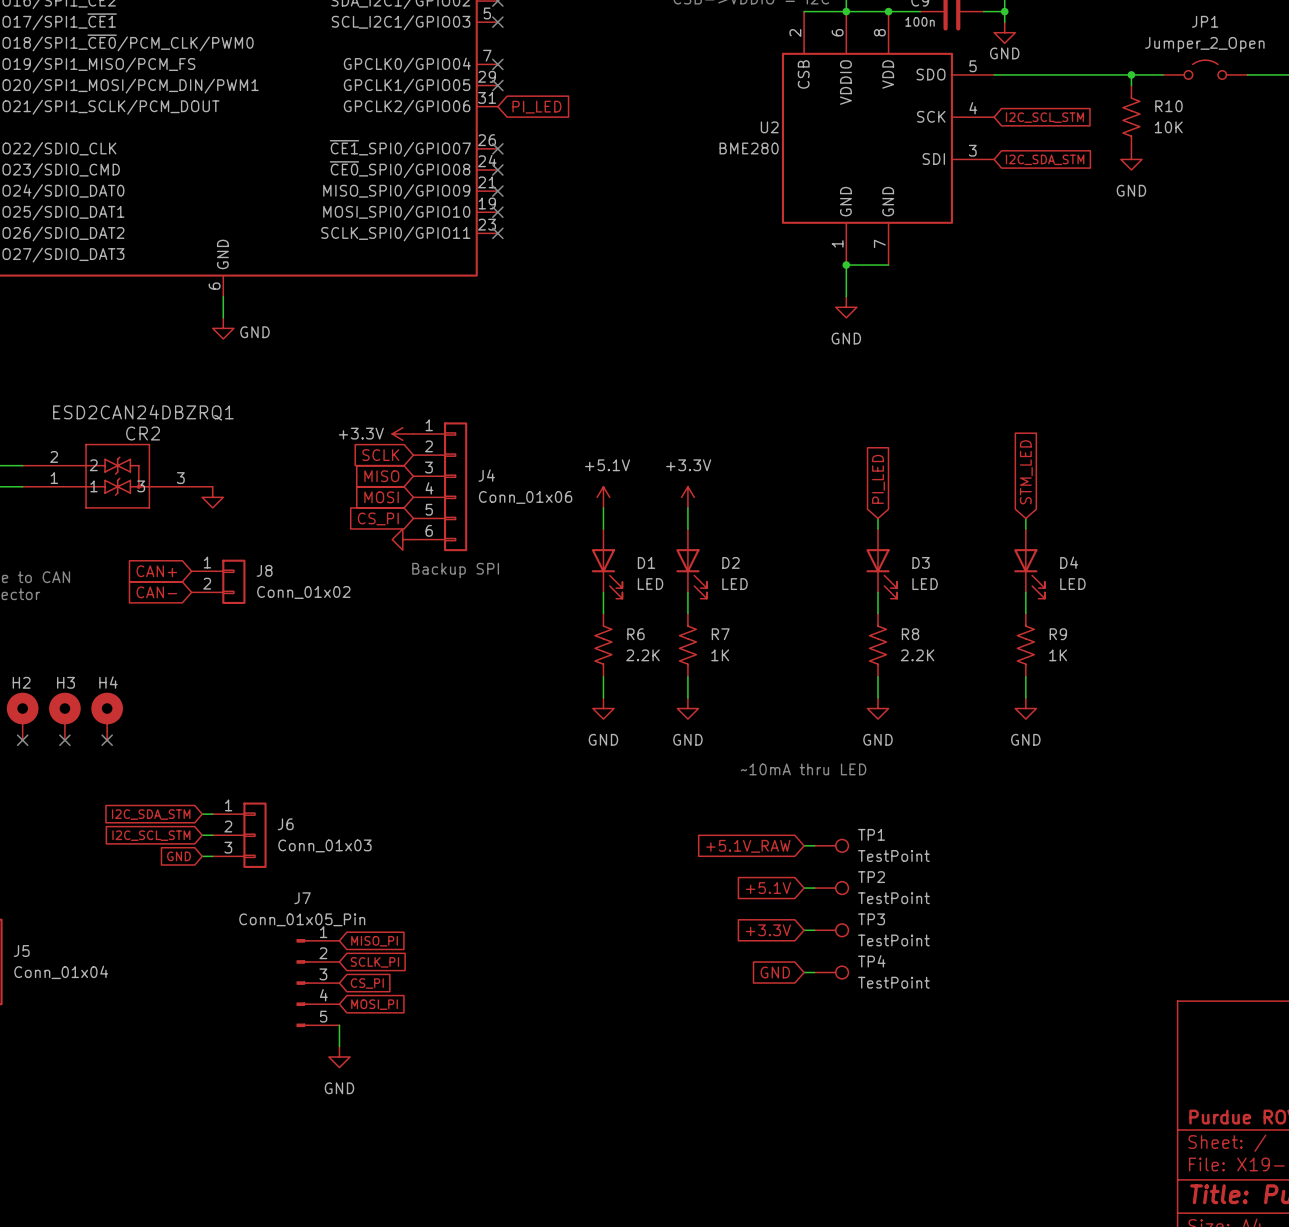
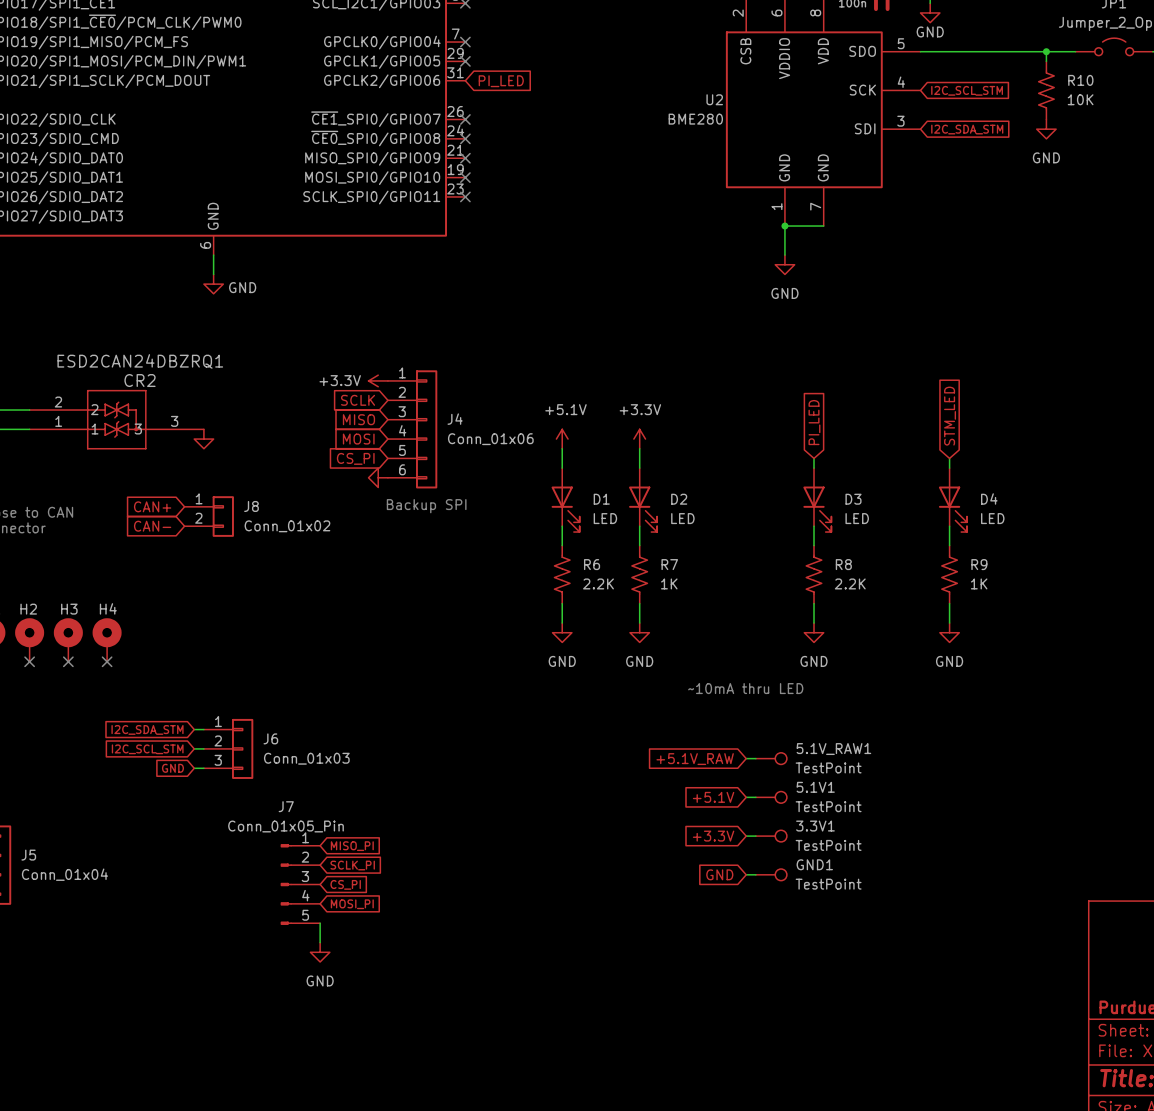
TP1 name: TP1 (871, 834) -> 5.1V_RAW1 (833, 749)
TP2 name: TP2 (871, 877) -> 5.1V1 (815, 787)
TP3 name: TP3 (871, 919) -> 3.3V1 (815, 826)
TP4 name: TP4 (871, 961) -> GND1 (814, 864)

